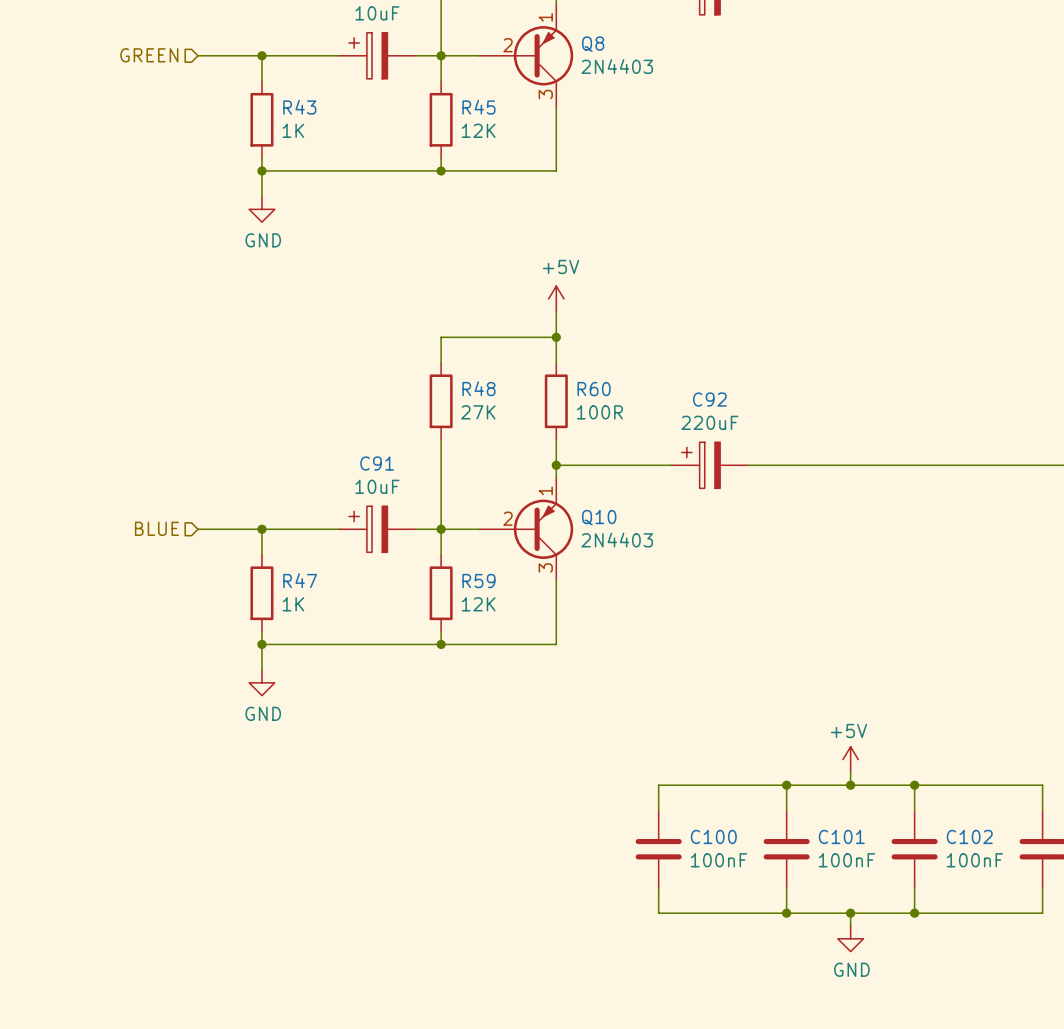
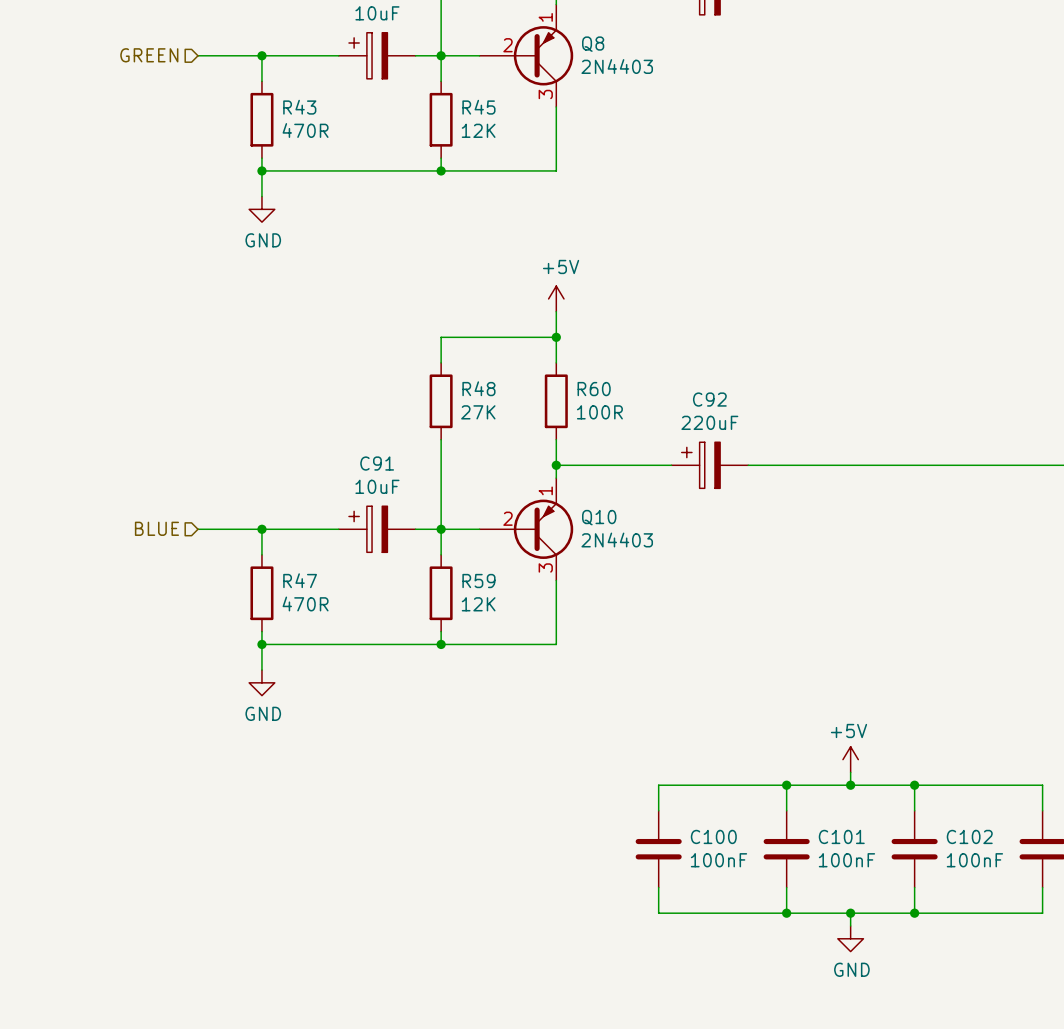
R43 value: 1K (293, 130) -> 470R (305, 130)
R47 value: 1K (293, 604) -> 470R (305, 604)

